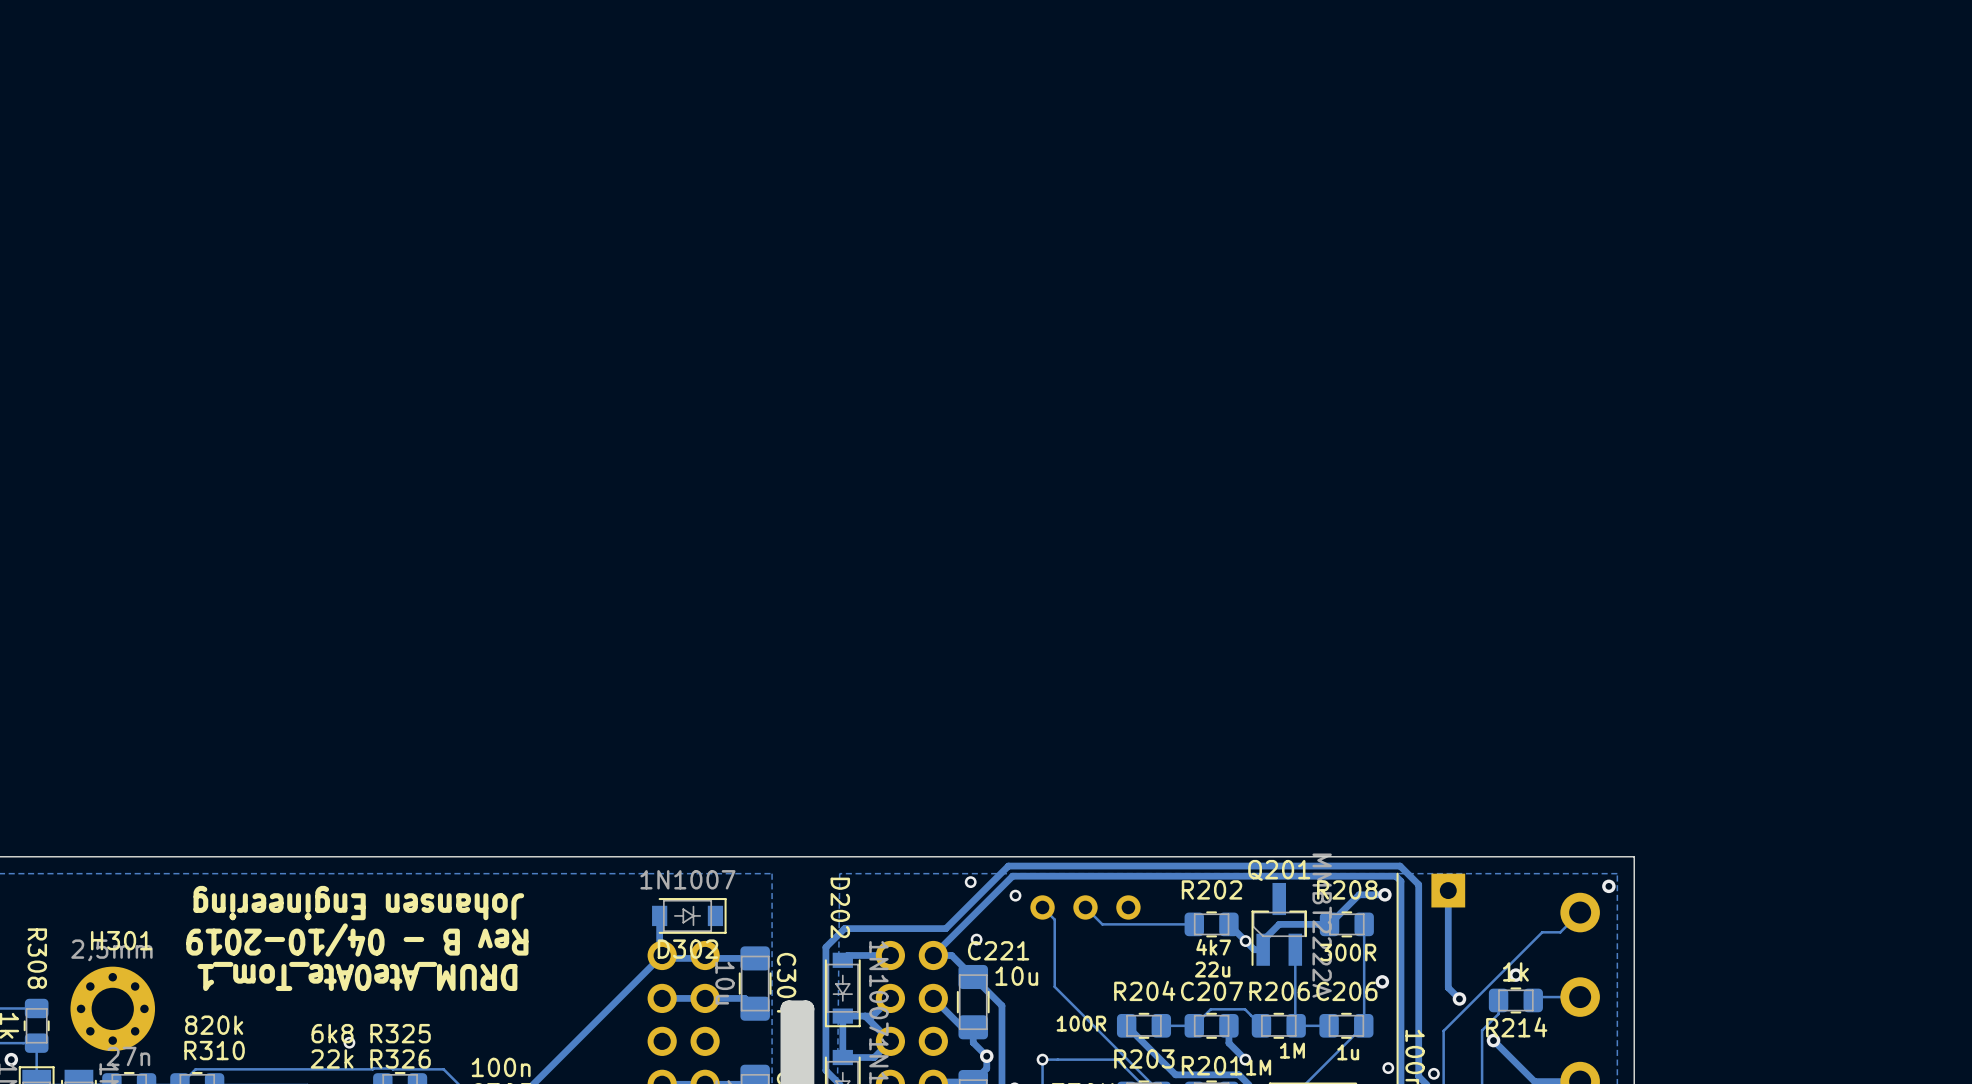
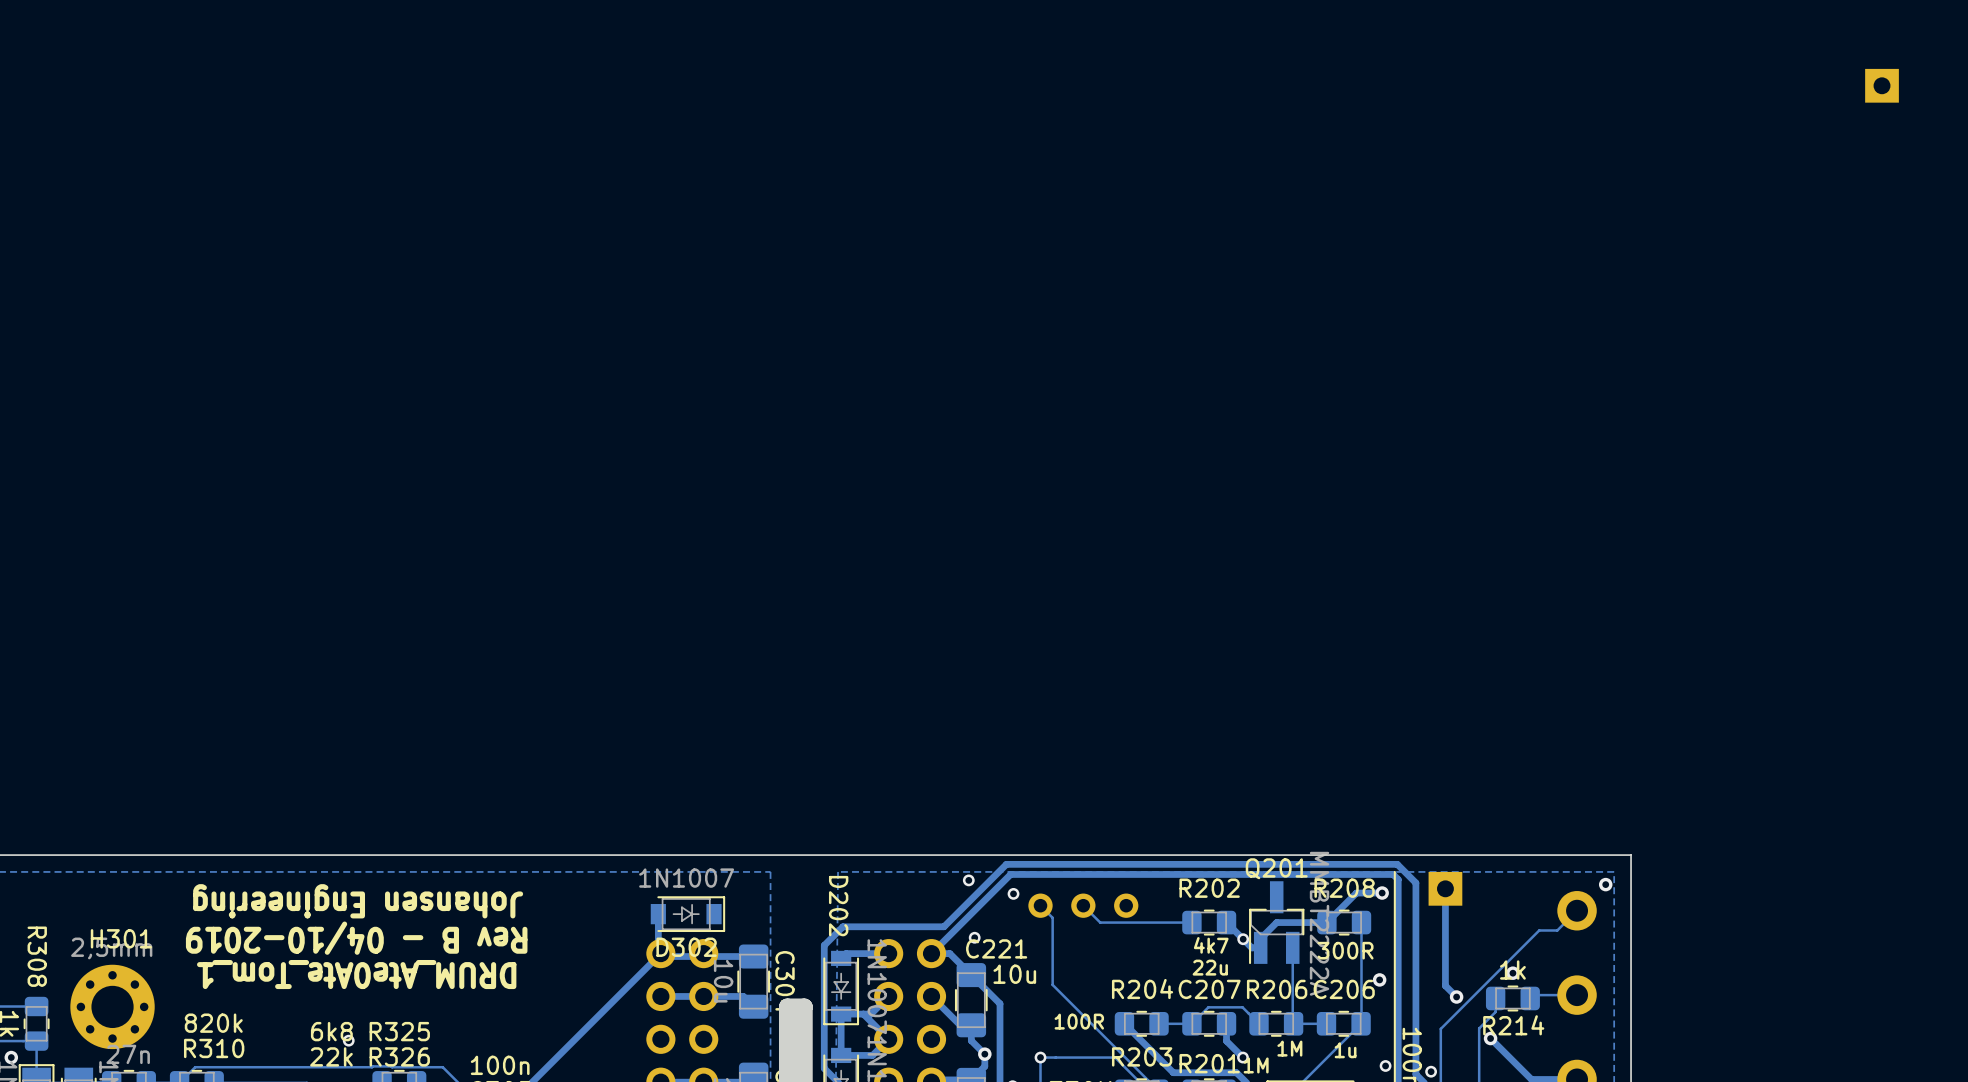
part: none -> (1882, 85)

